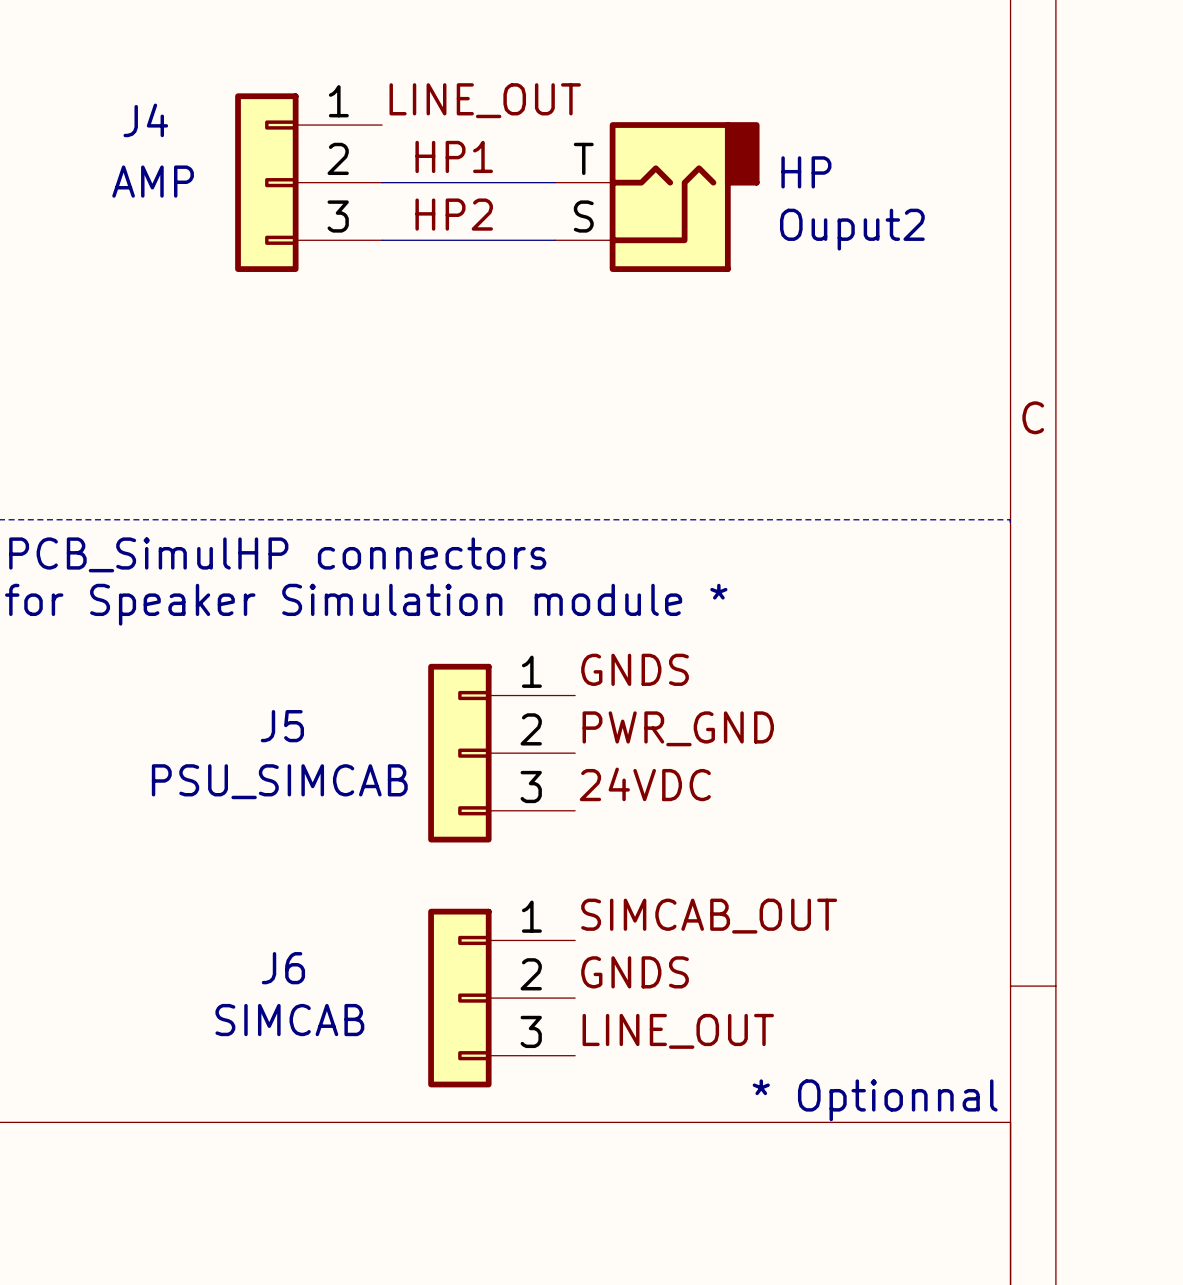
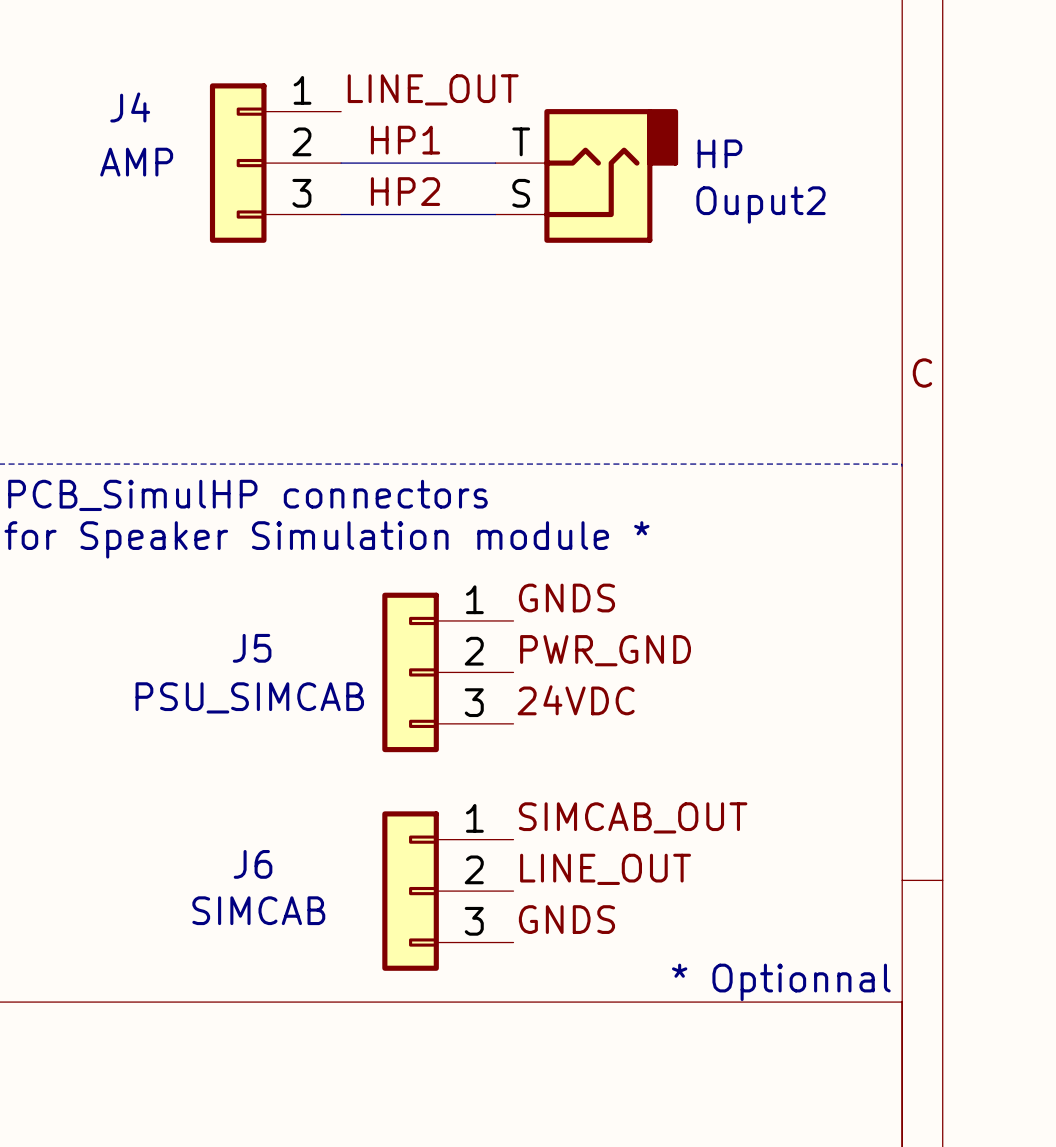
label: GNDS (635, 972) -> LINE_OUT (605, 869)
label: LINE_OUT (678, 1031) -> GNDS (566, 919)

